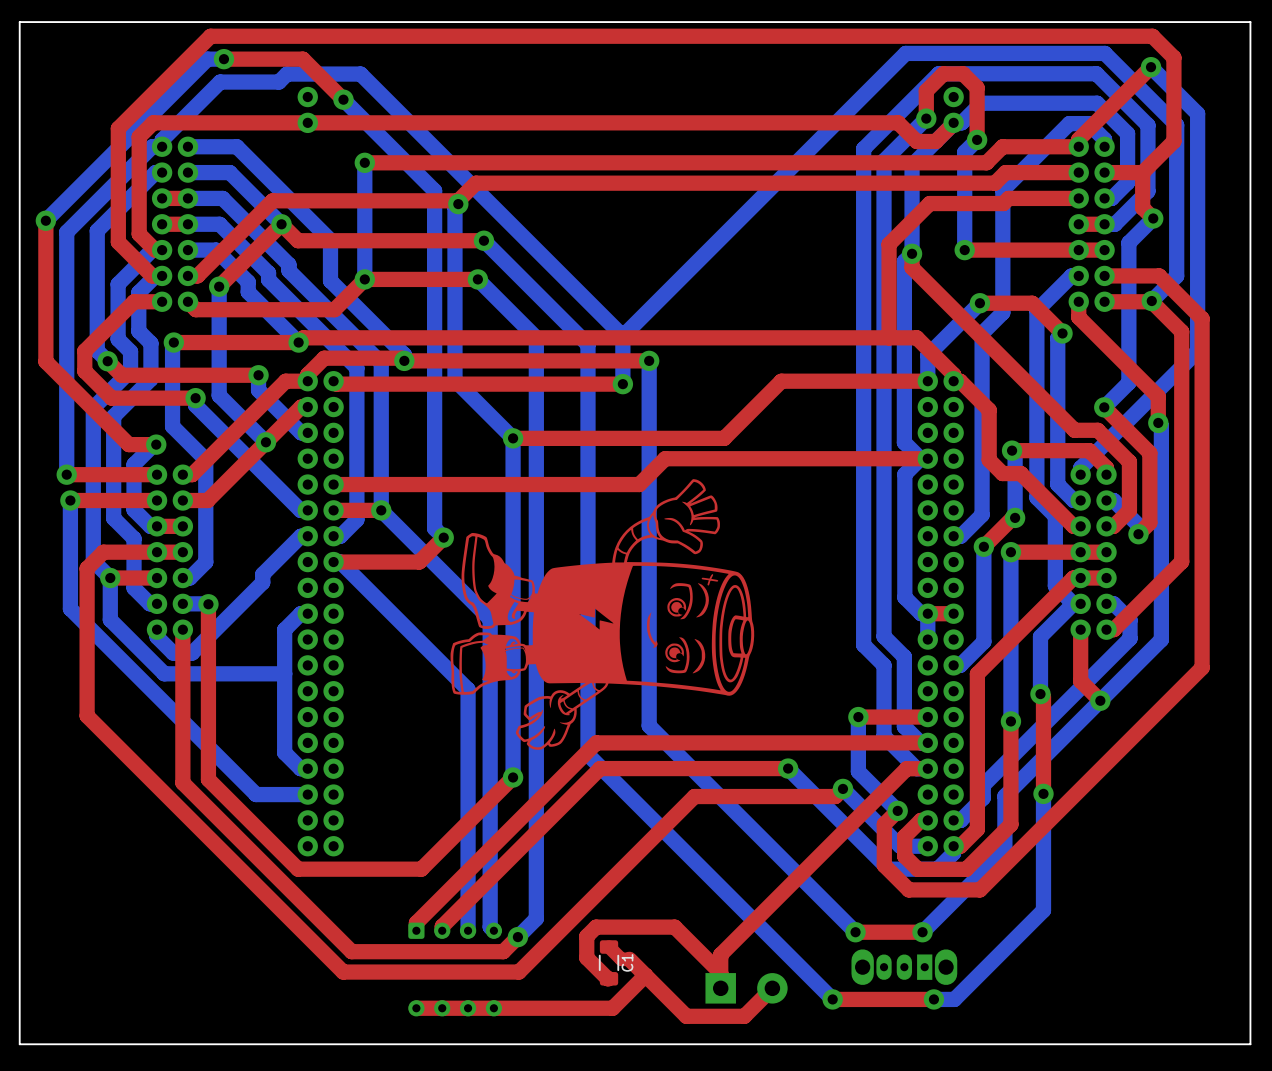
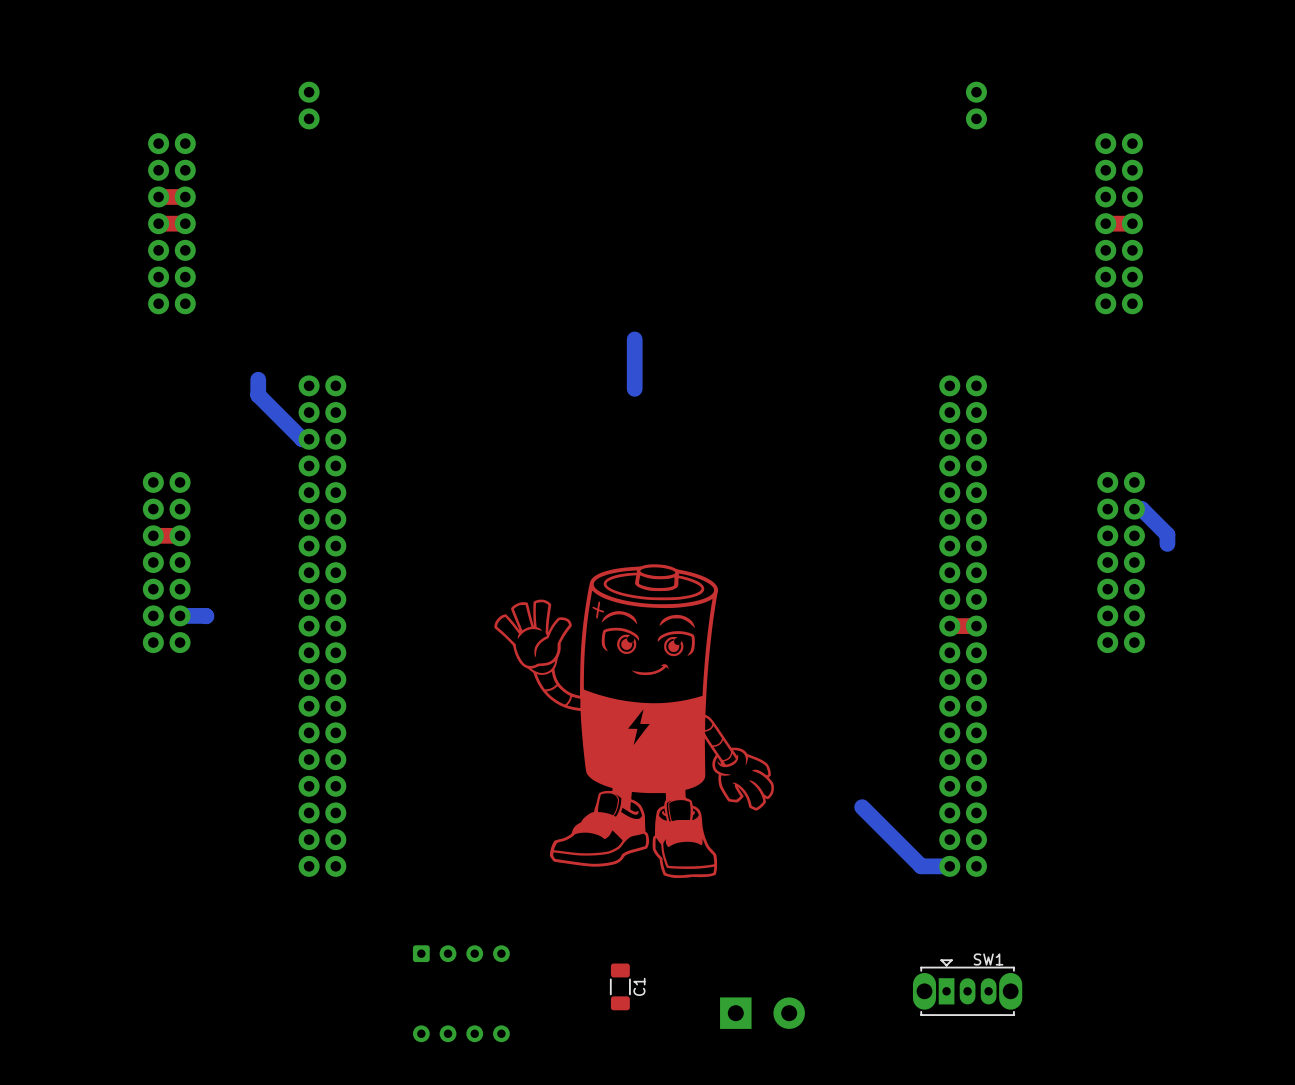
board edge: (19, 22) (1250, 22) (1250, 1044) (19, 1044) (19, 22) -> none
top track: (223, 59) (302, 59) (343, 99) -> none
bottom track: (223, 59) (207, 59) (45, 220) -> none
via: (223, 59) -> none
top track: (1151, 67) (1078, 139) (1078, 146) (1002, 146) (986, 162) (364, 162) -> none
bottom track: (1151, 67) (1197, 113) (1197, 351) (1080, 468) (1080, 474) -> none
via: (1151, 67) -> none
bottom track: (343, 99) (434, 190) (434, 528) (443, 537) -> none
via: (343, 99) -> none
top track: (926, 118) (926, 91) (943, 73) (963, 73) (977, 87) (977, 139) -> none
bottom track: (926, 118) (884, 160) (884, 636) (904, 656) (904, 726) (920, 742) (927, 742) -> none
via: (926, 118) -> none
top track: (953, 122) (935, 141) (916, 141) (898, 122) (153, 122) (139, 136) (139, 234) (155, 250) (162, 250) -> none
bottom track: (977, 139) (964, 152) (964, 250) -> none
via: (977, 139) -> none
bottom track: (187, 146) (236, 146) (330, 240) (330, 280) (404, 354) (404, 360) -> none
bottom track: (1104, 146) (1104, 139) (1088, 123) (1069, 123) (1002, 190) (1002, 312) (982, 333) (982, 514) (960, 536) (953, 536) -> none
bottom track: (364, 162) (364, 279) -> none
via: (364, 162) -> none
bottom track: (162, 172) (155, 172) (97, 230) (97, 350) (107, 361) -> none
bottom track: (187, 172) (229, 172) (281, 224) -> none
top track: (1078, 172) (1005, 172) (995, 183) (475, 183) (458, 200) -> none
top track: (1104, 172) (1142, 172) -> none
top track: (1142, 172) (1142, 207) (1153, 218) -> none
top track: (1142, 172) (1173, 141) (1173, 57) (1152, 36) (210, 36) (118, 128) (118, 242) (152, 275) (162, 275) -> none
bottom track: (187, 198) (222, 198) (288, 264) (288, 270) (381, 362) (381, 510) (490, 619) (490, 927) (493, 930) -> none
top track: (1078, 198) (1008, 198) (1003, 203) (929, 203) (889, 244) (889, 337) -> none
bottom track: (1104, 198) (1111, 198) (1127, 182) (1127, 133) (1097, 103) (981, 103) (961, 122) (953, 122) (912, 165) (912, 253) (904, 261) (904, 442) (920, 458) -> none
top track: (458, 200) (272, 200) (197, 275) (187, 275) -> none
bottom track: (458, 204) (454, 207) (454, 380) (513, 438) (513, 777) -> none
via: (458, 204) -> none
bottom track: (1153, 218) (1128, 242) (1128, 382) (1104, 407) -> none
via: (1153, 218) -> none
top track: (45, 220) (45, 361) (128, 444) (156, 444) -> none
via: (45, 220) -> none
bottom track: (187, 224) (219, 224) (268, 273) (268, 279) (356, 368) (356, 519) (340, 536) (333, 536) -> none
via: (281, 224) -> none
bottom track: (1104, 224) (1114, 224) (1147, 191) (1147, 125) (1096, 73) (938, 73) (863, 148) (863, 644) (884, 665) (884, 736) (916, 768) (927, 768) -> none
top track: (483, 240) (297, 240) (281, 224) (219, 286) -> none
bottom track: (483, 240) (587, 344) (587, 754) (832, 999) -> none
via: (483, 240) -> none
bottom track: (162, 250) (152, 250) (118, 284) (118, 339) (130, 351) (130, 370) (93, 407) (93, 561) (110, 578) (110, 619) (164, 673) (284, 673) -> none
bottom track: (187, 250) (216, 250) (248, 282) (248, 292) (298, 342) -> none
top track: (964, 250) (1104, 250) -> none
via: (964, 250) -> none
top track: (912, 253) (912, 267) (1074, 430) (1097, 430) (1129, 461) (1129, 510) (1113, 526) (1106, 526) -> none
via: (912, 253) -> none
bottom track: (162, 275) (155, 275) (138, 292) (138, 331) (150, 343) (150, 379) (113, 416) (113, 518) (134, 538) (134, 588) (149, 603) (157, 603) -> none
bottom track: (1078, 275) (1071, 275) (1036, 310) (1036, 497) (1055, 516) (1055, 585) (1073, 603) -> none
top track: (1104, 275) (1159, 275) (1202, 318) (1202, 667) (979, 889) (908, 889) (884, 865) (884, 824) (897, 810) -> none
via: (364, 279) -> none
top track: (477, 279) (364, 279) (334, 309) (195, 309) (187, 301) -> none
bottom track: (477, 279) (536, 337) (536, 918) (517, 937) -> none
via: (477, 279) -> none
bottom track: (219, 286) (219, 395) (265, 442) -> none
via: (219, 286) -> none
top track: (162, 301) (134, 301) (84, 351) (84, 371) (111, 398) (195, 398) -> none
top track: (1078, 301) (1078, 317) (1158, 396) (1158, 422) -> none
top track: (1104, 301) (1151, 301) -> none
top track: (1151, 301) (1181, 331) (1181, 561) (1113, 629) (1106, 629) -> none
bottom track: (1151, 301) (1176, 276) (1176, 125) (1104, 53) (905, 53) (622, 336) (360, 74) (286, 74) (278, 82) (220, 82) (162, 140) (162, 146) (152, 146) (66, 232) (66, 474) -> none
via: (1151, 301) -> none
top track: (979, 303) (1032, 303) (1062, 333) -> none
bottom track: (979, 303) (927, 355) (927, 381) -> none
via: (979, 303) -> none
bottom track: (1062, 333) (1057, 338) (1057, 484) (1073, 500) (1080, 500) -> none
via: (1062, 333) -> none
top track: (173, 342) (298, 342) (303, 337) (916, 337) (953, 374) (953, 381) (960, 381) (989, 410) (989, 460) (1002, 473) (1020, 473) (1073, 526) (1080, 526) -> none
bottom track: (173, 342) (172, 426) (205, 459) (205, 562) (189, 578) (182, 578) -> none
via: (173, 342) -> none
via: (298, 342) -> none
via: (404, 360) -> none
top track: (649, 360) (404, 360) (401, 358) (324, 358) (307, 374) (307, 381) (285, 381) (192, 474) (182, 474) -> none
bottom track: (649, 360) (649, 725) (855, 932) -> none
via: (649, 360) -> none
top track: (107, 361) (121, 375) (258, 375) -> none
via: (107, 361) -> none
via: (258, 375) -> none
top track: (333, 381) (336, 384) (622, 384) -> none
top track: (927, 381) (781, 381) (724, 438) (513, 438) -> none
via: (622, 384) -> none
bottom track: (195, 398) (195, 405) (300, 510) (307, 510) -> none
via: (195, 398) -> none
top track: (307, 407) (301, 407) (207, 500) (182, 500) -> none
top track: (1104, 407) (1149, 452) (1149, 522) (1138, 534) -> none
via: (1104, 407) -> none
bottom track: (1158, 422) (1161, 426) (1161, 639) (1004, 796) (1004, 849) (922, 932) -> none
via: (1158, 422) -> none
via: (513, 438) -> none
via: (265, 442) -> none
bottom track: (156, 444) (153, 444) (134, 464) (134, 509) (150, 526) (157, 526) -> none
via: (156, 444) -> none
top track: (1012, 450) (1089, 450) (1106, 467) (1106, 474) -> none
bottom track: (1012, 450) (1015, 453) (1015, 517) -> none
via: (1012, 450) -> none
bottom track: (920, 458) (904, 474) (904, 597) (921, 613) (927, 613) (927, 639) -> none
top track: (927, 458) (665, 458) (639, 484) (333, 484) -> none
top track: (66, 474) (157, 474) -> none
via: (66, 474) -> none
drawing: [450, 479, 755, 750] -> none
top track: (70, 500) (157, 500) -> none
bottom track: (70, 500) (70, 608) (256, 794) (307, 794) -> none
via: (70, 500) -> none
top track: (333, 510) (381, 510) -> none
via: (381, 510) -> none
top track: (1015, 517) (1012, 517) (983, 546) -> none
via: (1015, 517) -> none
via: (1138, 534) -> none
bottom track: (307, 536) (300, 536) (262, 574) (262, 582) (192, 653) (173, 653) (157, 636) (157, 629) -> none
top track: (443, 537) (419, 562) (333, 562) -> none
via: (443, 537) -> none
bottom track: (983, 546) (983, 641) (960, 665) (953, 665) -> none
via: (983, 546) -> none
top track: (182, 552) (103, 552) (87, 568) (87, 715) (343, 972) (518, 972) (694, 796) (835, 796) (842, 788) -> none
top track: (1010, 552) (1106, 552) -> none
bottom track: (1010, 552) (1010, 721) -> none
via: (1010, 552) -> none
drawing: none -> [494, 564, 774, 879]
bottom track: (333, 562) (340, 562) (468, 689) (468, 930) -> none
top track: (110, 578) (157, 578) -> none
via: (110, 578) -> none
top track: (1106, 578) (1073, 578) (977, 674) (977, 829) (960, 846) (953, 846) -> none
bottom track: (1073, 603) (1040, 636) (1040, 694) -> none
bottom track: (1106, 603) (1113, 603) (1130, 620) (1130, 638) (983, 785) (983, 797) (960, 820) (953, 820) -> none
top track: (208, 604) (208, 779) (298, 869) (421, 869) (513, 777) -> none
via: (208, 604) -> none
bottom track: (307, 613) (300, 613) (284, 629) (284, 752) (300, 768) (307, 768) -> none
top track: (182, 629) (182, 782) (351, 951) (503, 951) (517, 937) -> none
top track: (1080, 629) (1080, 681) (1100, 700) -> none
top track: (1040, 694) (1043, 697) (1043, 793) -> none
via: (1040, 694) -> none
via: (1100, 700) -> none
top track: (858, 717) (927, 717) -> none
bottom track: (858, 717) (858, 771) (897, 810) -> none
via: (858, 717) -> none
top track: (1010, 721) (1010, 824) (966, 869) (917, 869) (904, 856) (904, 836) (920, 820) (927, 820) -> none
via: (1010, 721) -> none
top track: (927, 742) (596, 742) (416, 922) (416, 930) -> none
top track: (788, 768) (600, 768) (442, 926) (442, 930) -> none
bottom track: (788, 768) (888, 869) (937, 869) (953, 853) (953, 846) -> none
via: (788, 768) -> none
top track: (927, 768) (906, 768) (720, 954) (720, 988) -> none
via: (513, 777) -> none
via: (842, 788) -> none
bottom track: (1043, 793) (1043, 910) (954, 999) (933, 999) -> none
via: (1043, 793) -> none
via: (897, 810) -> none
top track: (855, 932) (922, 932) -> none
via: (855, 932) -> none
via: (922, 932) -> none
via: (517, 937) -> none
top track: (609, 947) (621, 959) (629, 959) (645, 975) -> none
SW1 side: bottom (904, 967) -> top (967, 987)
top track: (720, 973) (674, 927) (596, 927) (586, 936) (586, 957) (609, 978) -> none
top track: (645, 975) (612, 1008) (416, 1008) -> none
top track: (645, 975) (686, 1016) (744, 1016) (772, 988) -> none
top track: (832, 999) (933, 999) -> none
via: (832, 999) -> none
via: (933, 999) -> none

